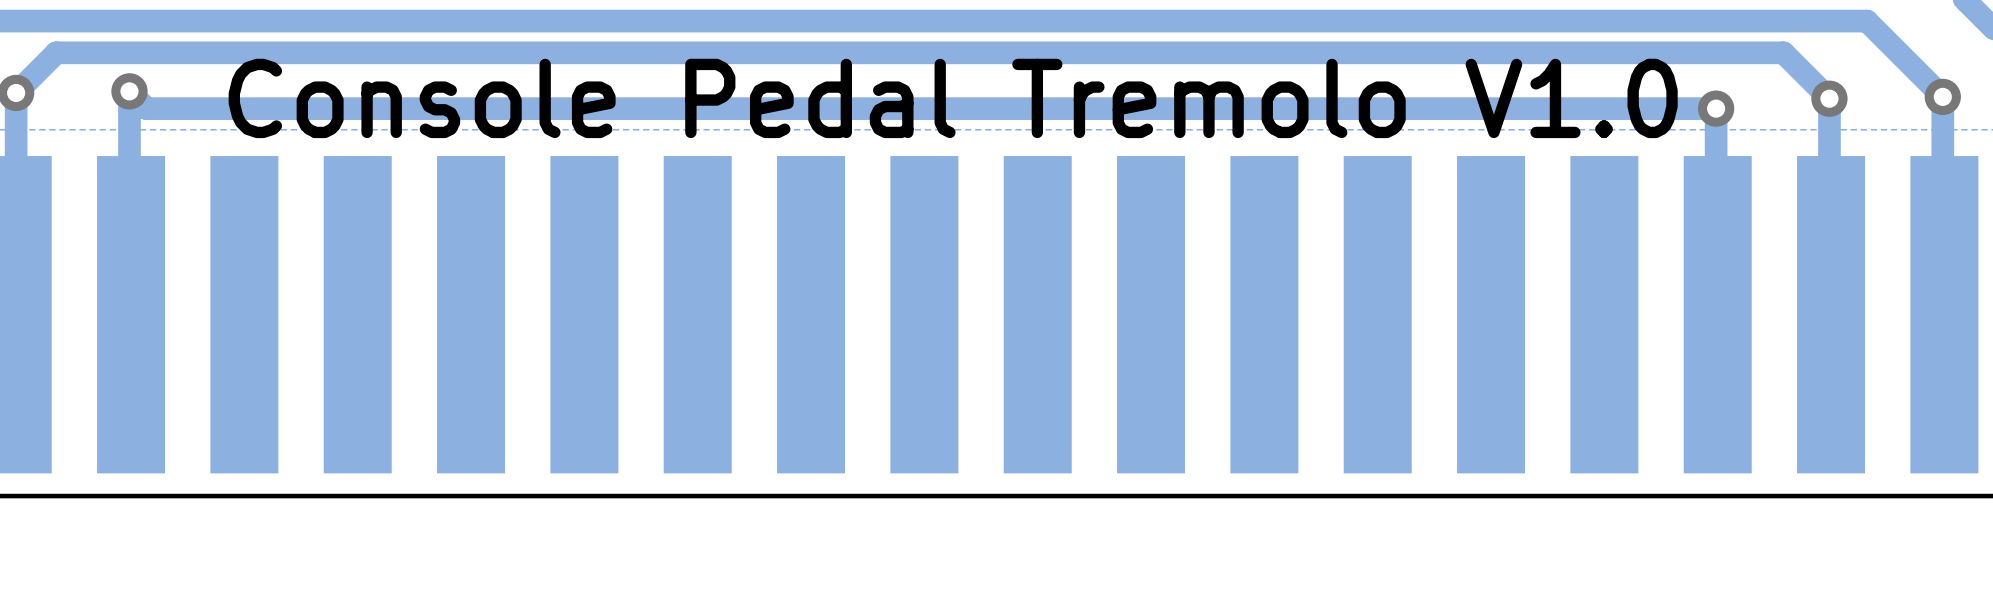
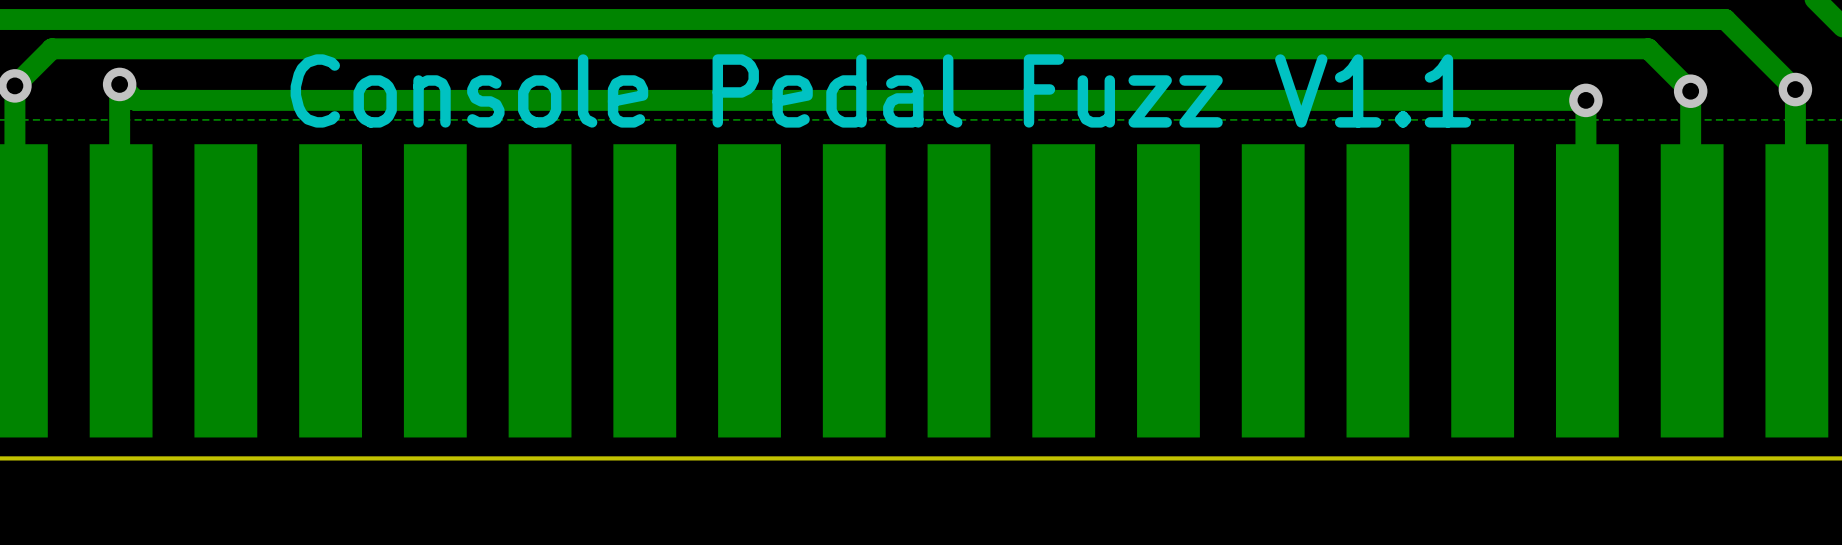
text: Console Pedal Tremolo V1.0 (953, 98) -> Console Pedal Fuzz V1.1 (880, 90)

